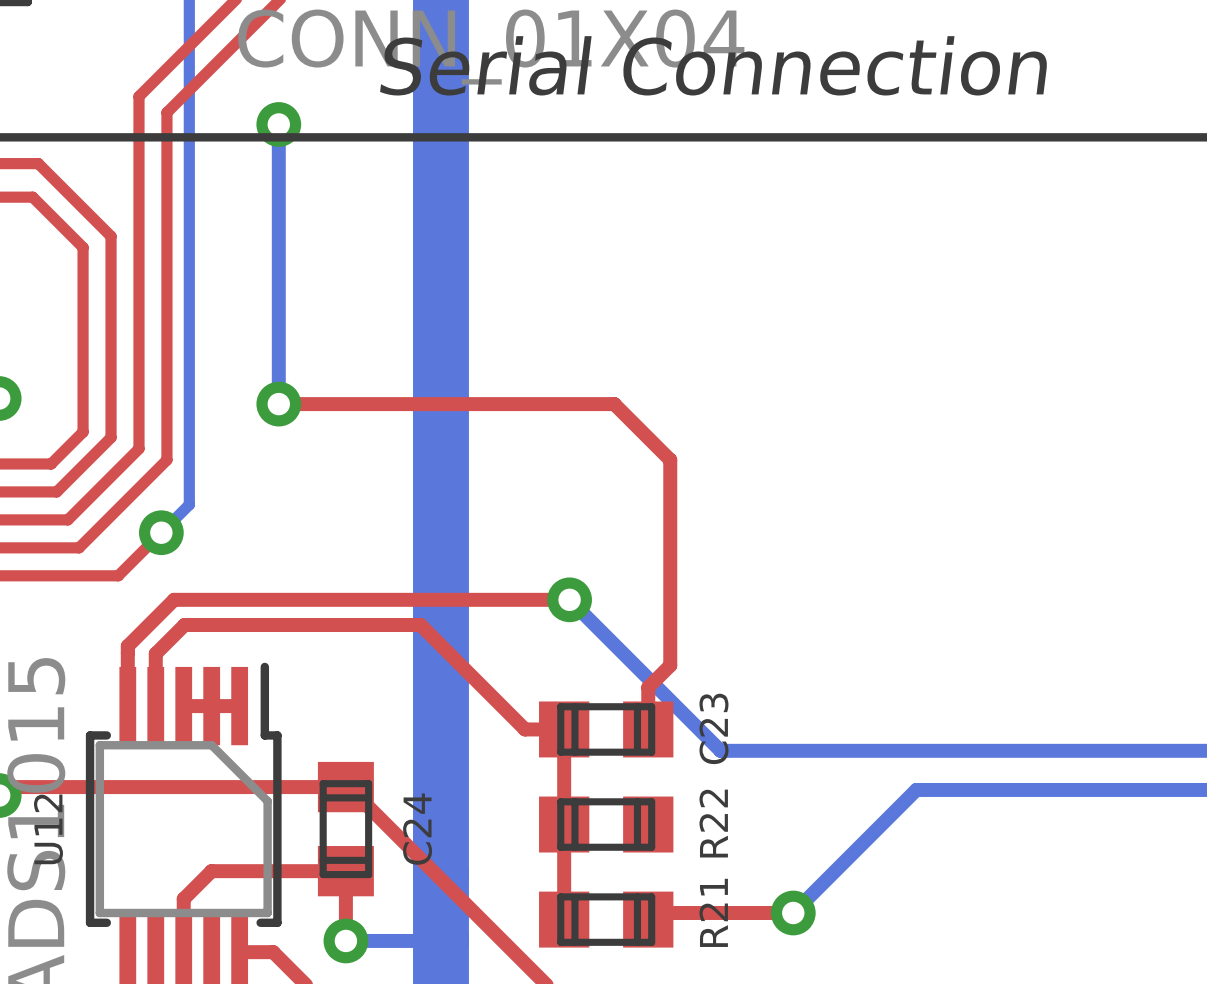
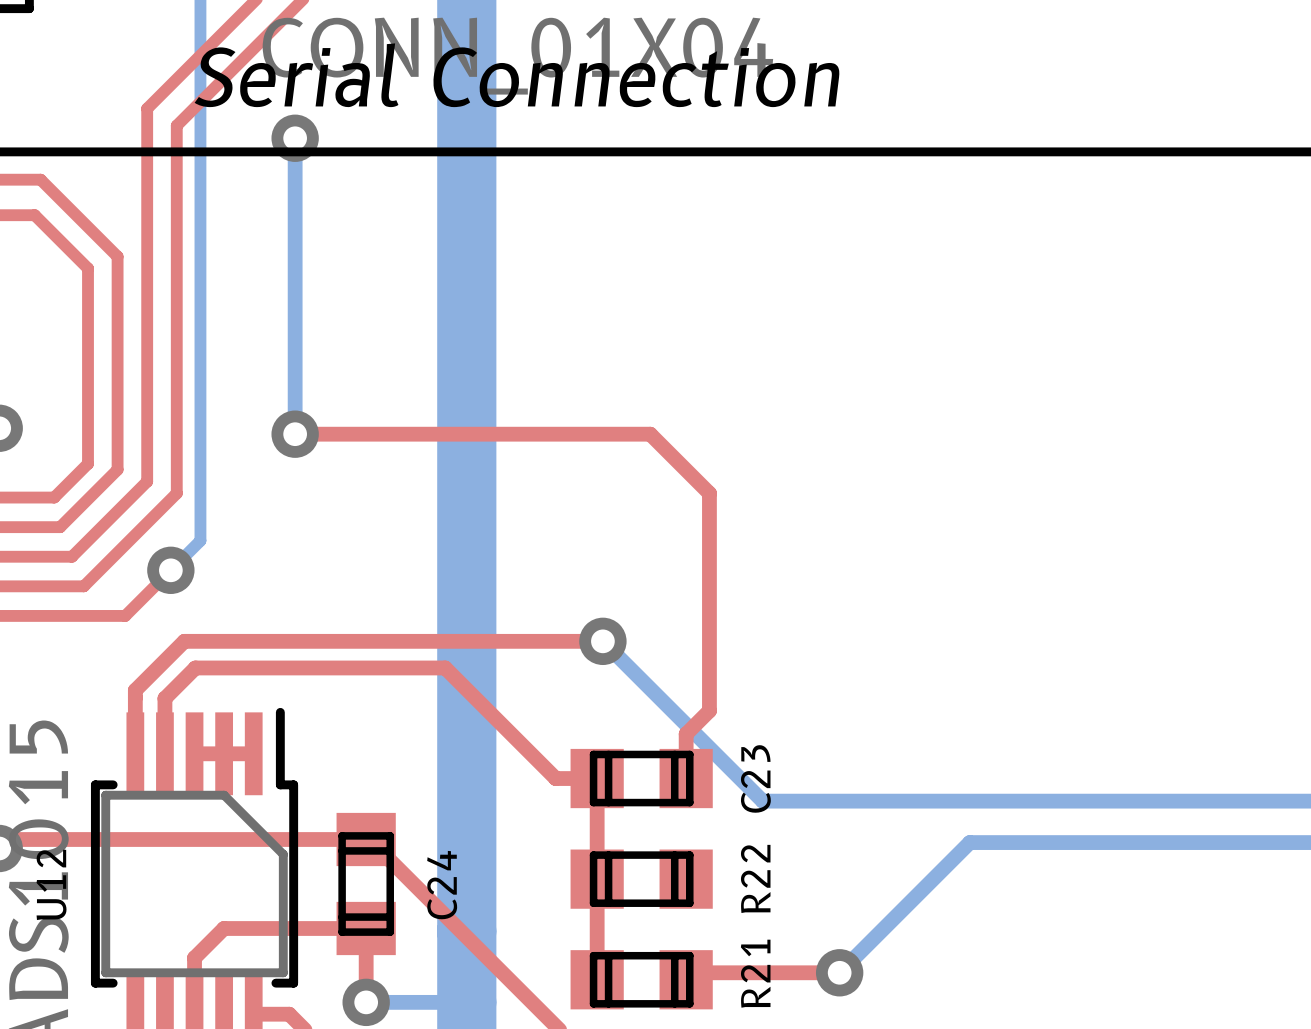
text position: Serial Connection (713, 65) -> Serial Connection (517, 75)

